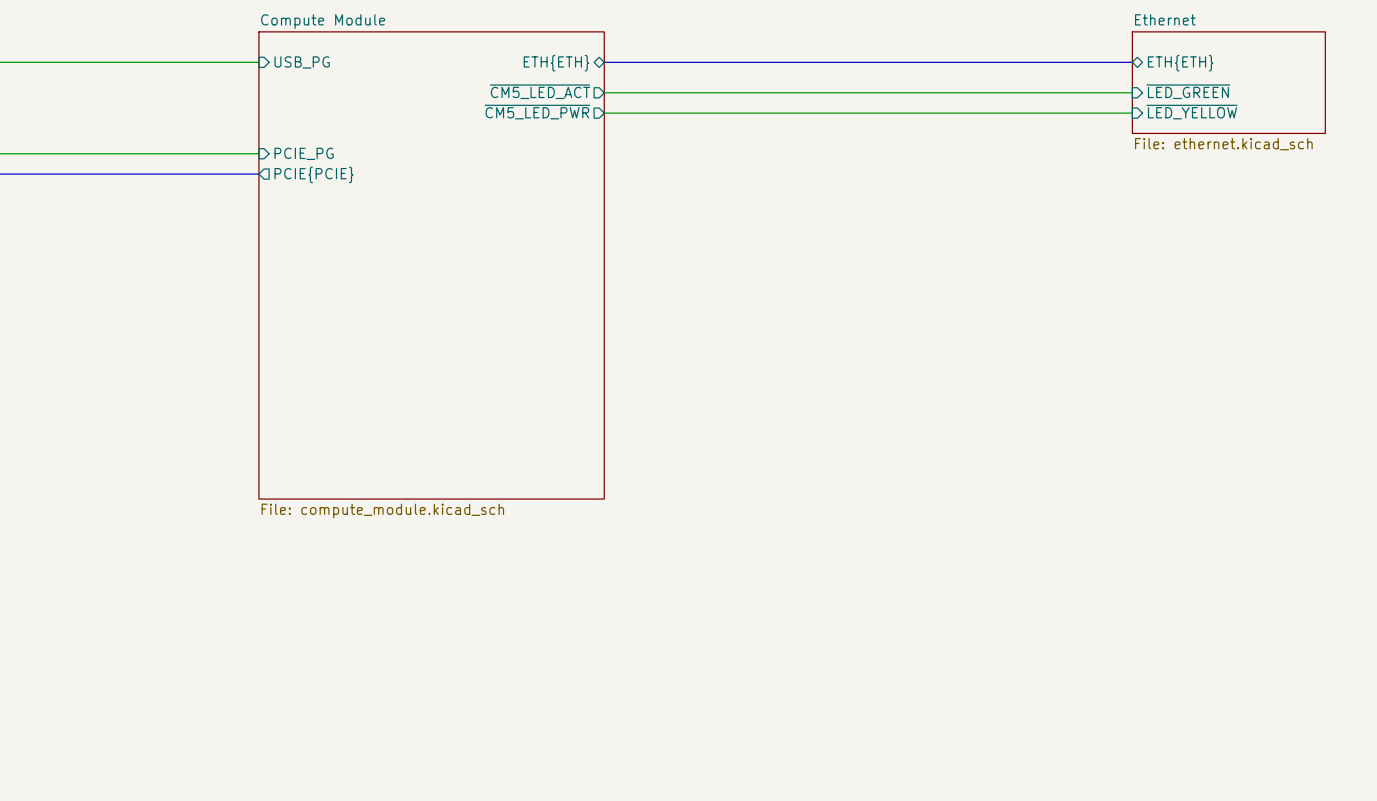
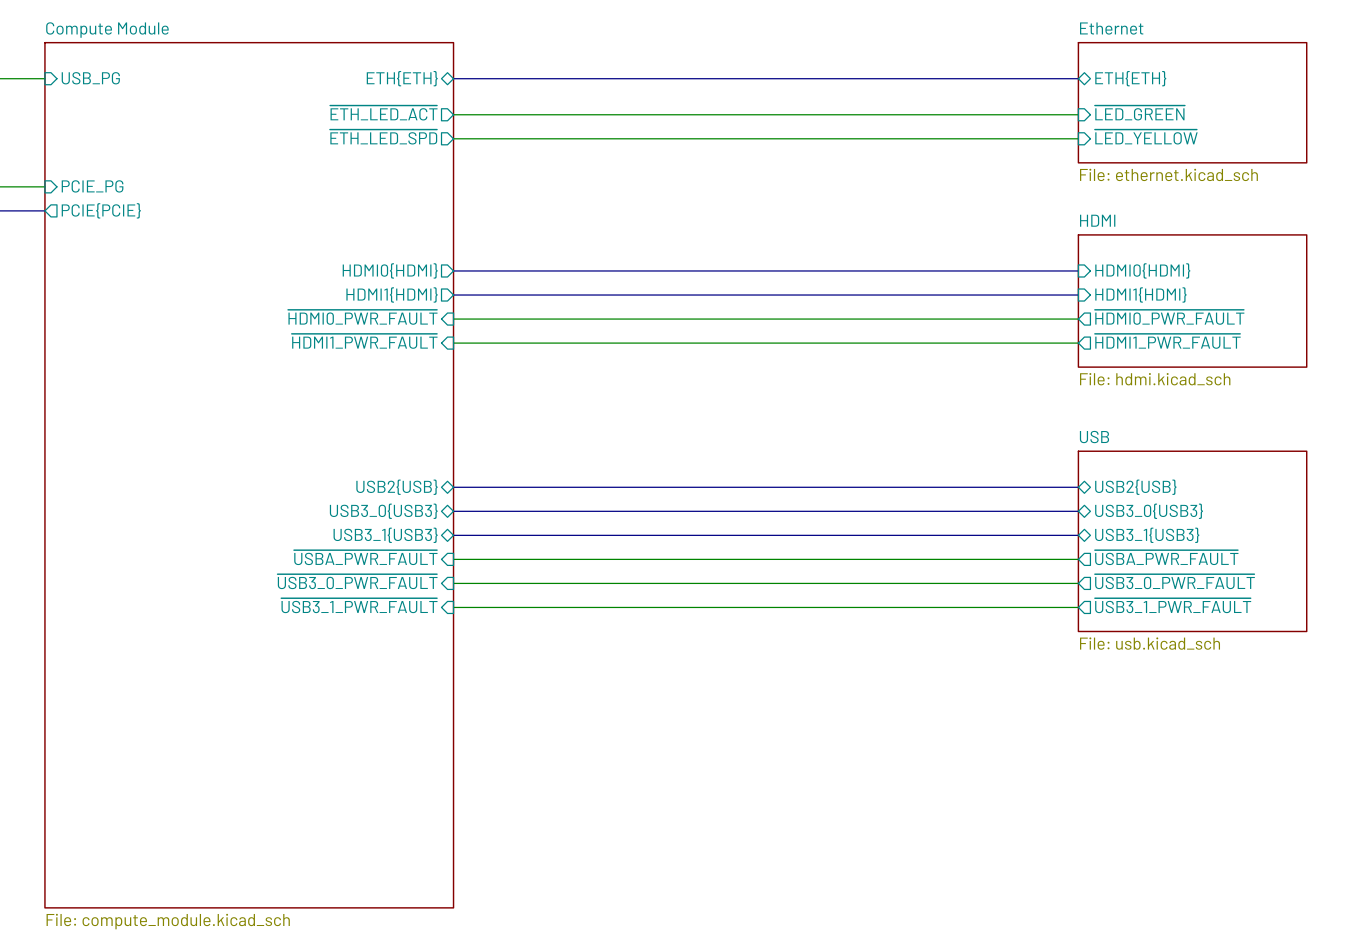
sheet pin: ~{CM5_LED_ACT} (540, 91) -> ~{ETH_LED_ACT} (383, 113)
sheet pin: ~{CM5_LED_PWR} (537, 112) -> ~{ETH_LED_SPD} (383, 137)
bus: none -> (453, 270) (1078, 270)
sheet pin: none -> HDMI0{HDMI} (390, 270)
sheet pin: none -> HDMI0{HDMI} (1142, 270)
sheet pin: none -> HDMI1{HDMI} (392, 294)
bus: none -> (453, 295) (1078, 295)
sheet pin: none -> HDMI1{HDMI} (1140, 294)
sheet HDMI: none -> File: hdmi.kicad_sch (1192, 301)
sheet pin: none -> ~{HDMI0_PWR_FAULT} (362, 317)
sheet pin: none -> ~{HDMI0_PWR_FAULT} (1169, 317)
sheet Compute Module: File: compute_module.kicad_sch (431, 265) -> none
wire: none -> (453, 319) (1078, 319)
sheet pin: none -> ~{HDMI1_PWR_FAULT} (364, 341)
sheet pin: none -> ~{HDMI1_PWR_FAULT} (1167, 341)
wire: none -> (453, 343) (1078, 343)
sheet Compute Module: none -> File: compute_module.kicad_sch (249, 475)
bus: none -> (453, 487) (1078, 487)
sheet pin: none -> USB2{USB} (397, 487)
sheet pin: none -> USB2{USB} (1135, 487)
bus: none -> (453, 511) (1078, 511)
sheet pin: none -> USB3_0{USB3} (383, 511)
sheet pin: none -> USB3_0{USB3} (1149, 511)
bus: none -> (453, 535) (1078, 535)
sheet pin: none -> USB3_1{USB3} (385, 535)
sheet pin: none -> USB3_1{USB3} (1147, 535)
sheet USB: none -> File: usb.kicad_sch (1192, 541)
sheet pin: none -> ~{USBA_PWR_FAULT} (365, 557)
sheet pin: none -> ~{USBA_PWR_FAULT} (1166, 557)
wire: none -> (453, 559) (1078, 559)
sheet pin: none -> ~{USB3_0_PWR_FAULT} (357, 581)
sheet pin: none -> ~{USB3_0_PWR_FAULT} (1174, 581)
wire: none -> (453, 583) (1078, 583)
sheet pin: none -> ~{USB3_1_PWR_FAULT} (359, 605)
sheet pin: none -> ~{USB3_1_PWR_FAULT} (1173, 605)
wire: none -> (453, 607) (1078, 607)

